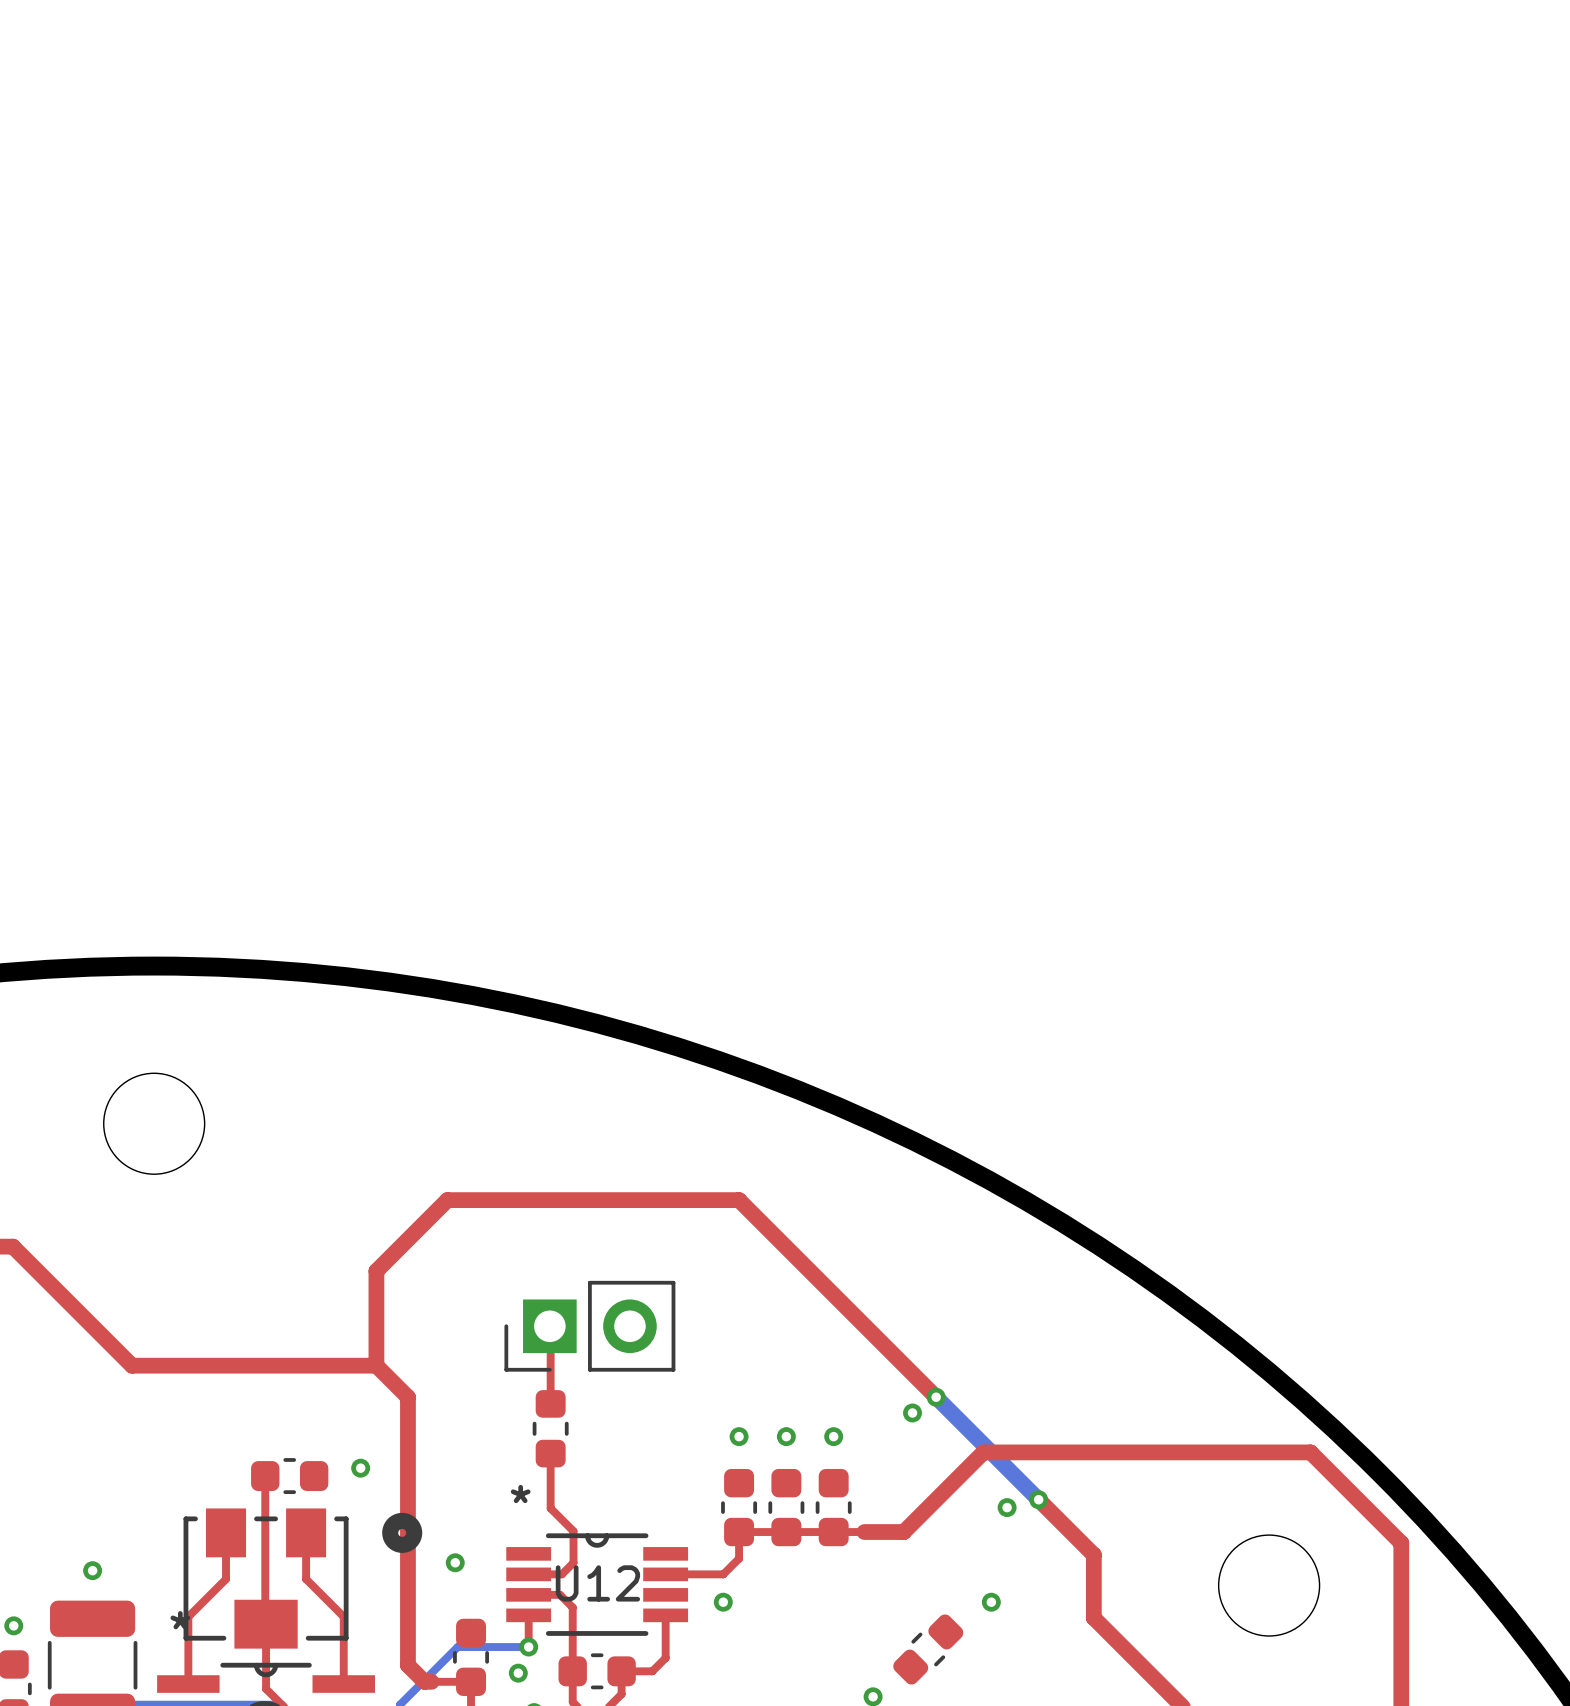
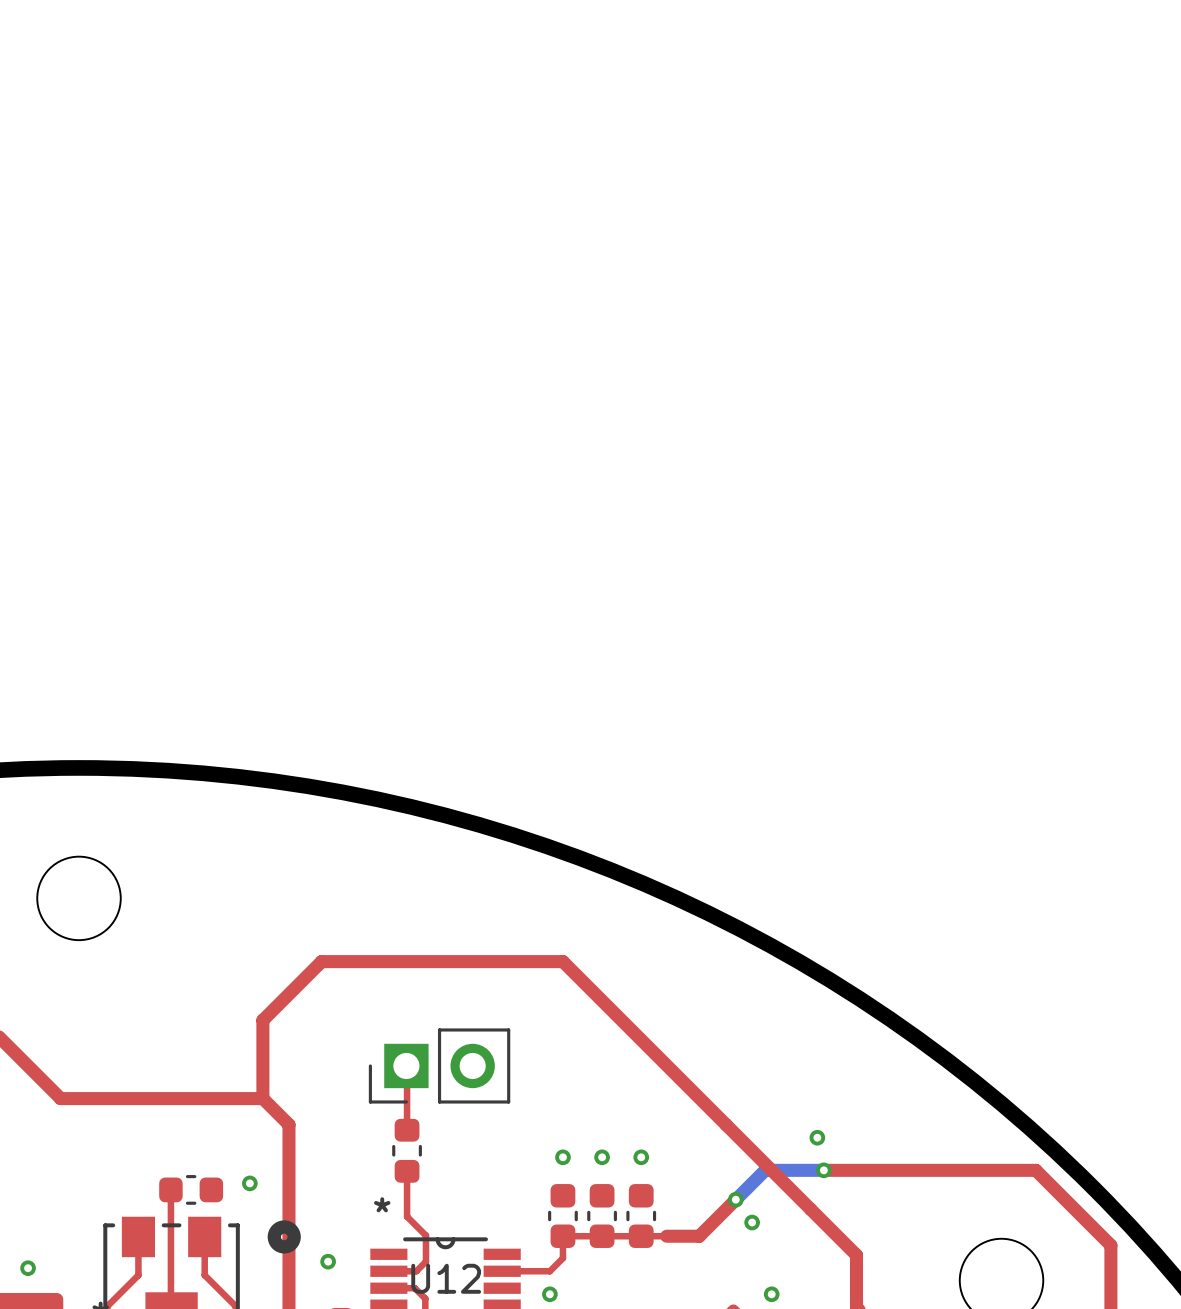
top track: none -> (726, 1124) (810, 1209)
bottom track: (936, 1397) (1038, 1499) -> none
via: (936, 1397) -> none
via: (912, 1412) -> none
via: none -> (817, 1137)
top track: (1054, 1452) (983, 1452) (947, 1487) -> none
bottom track: none -> (823, 1170) (765, 1170) (735, 1199)
via: none -> (823, 1170)
via: none -> (735, 1199)
via: (1038, 1499) -> none
via: (1007, 1507) -> none
via: none -> (752, 1222)

